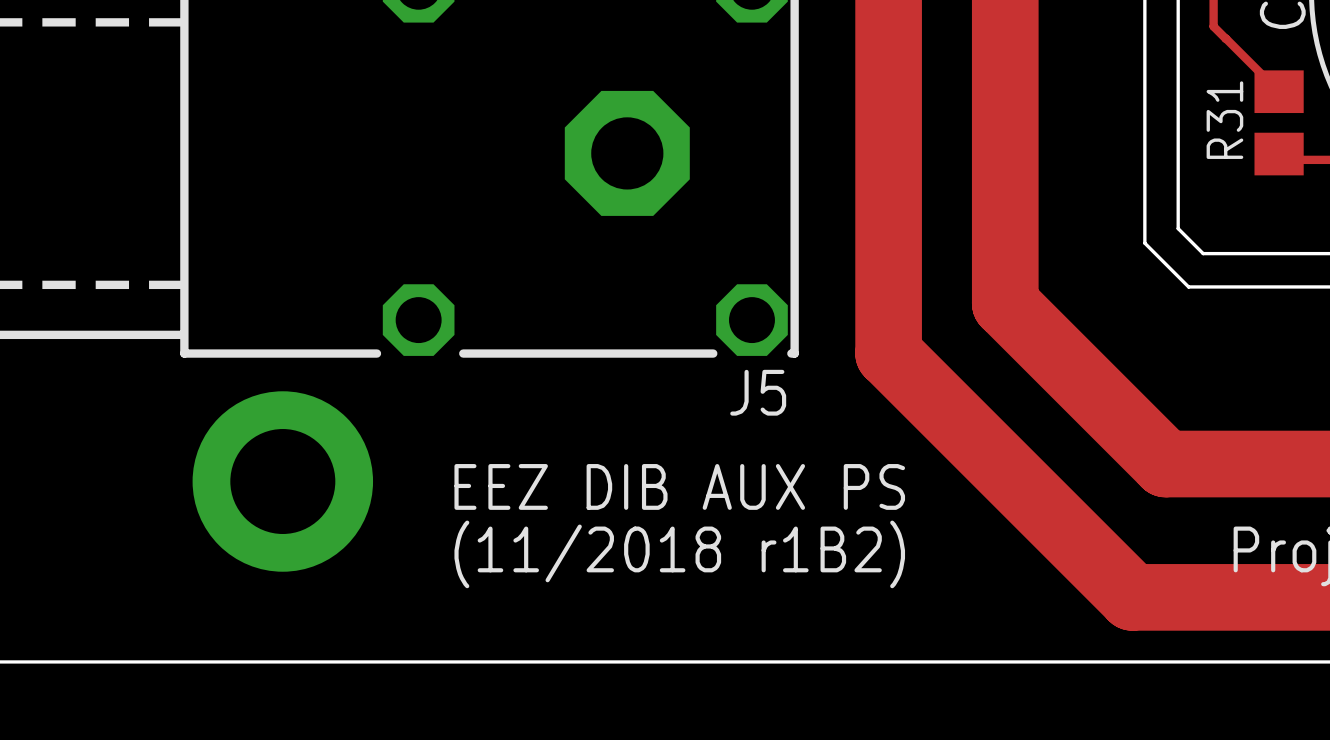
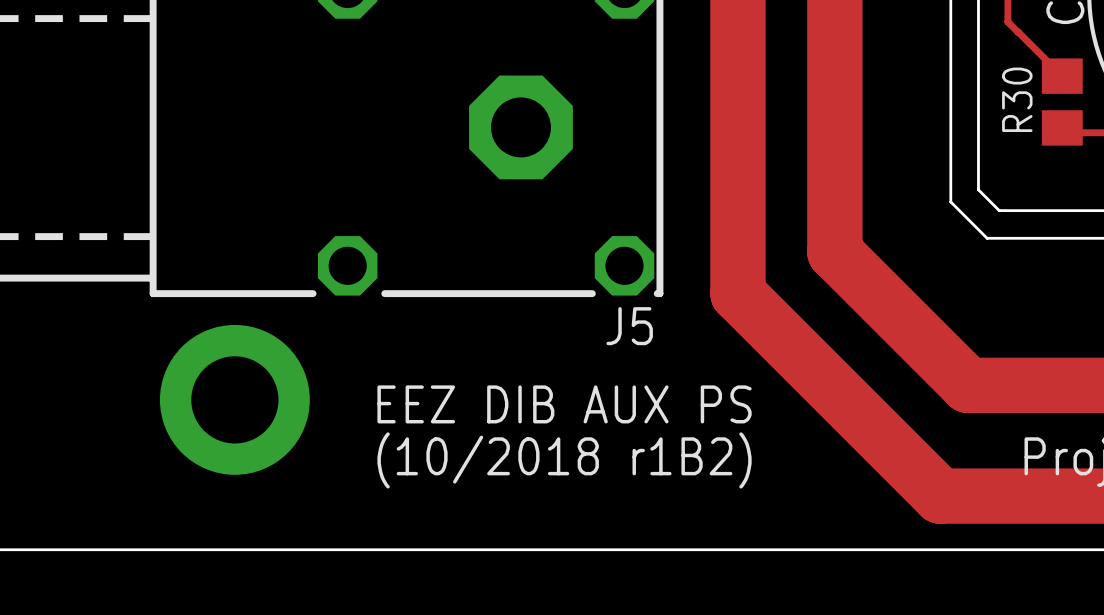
R31 name: R31 (1224, 120) -> R30 (1017, 99)
text: (11/2018 r1B2) (679, 554) -> (10/2018 r1B2) (564, 460)

